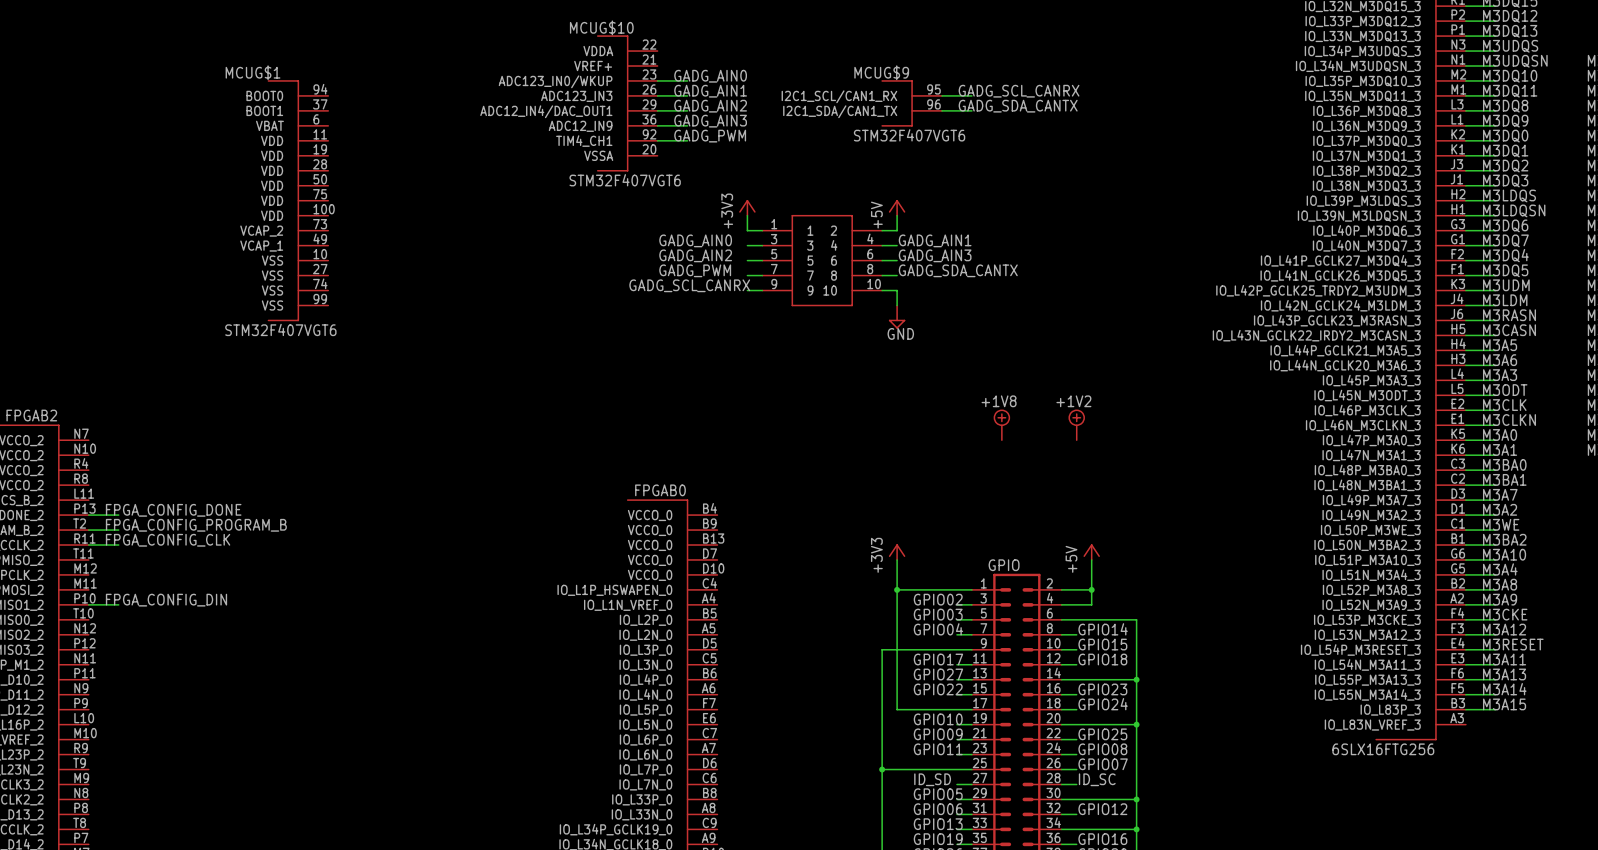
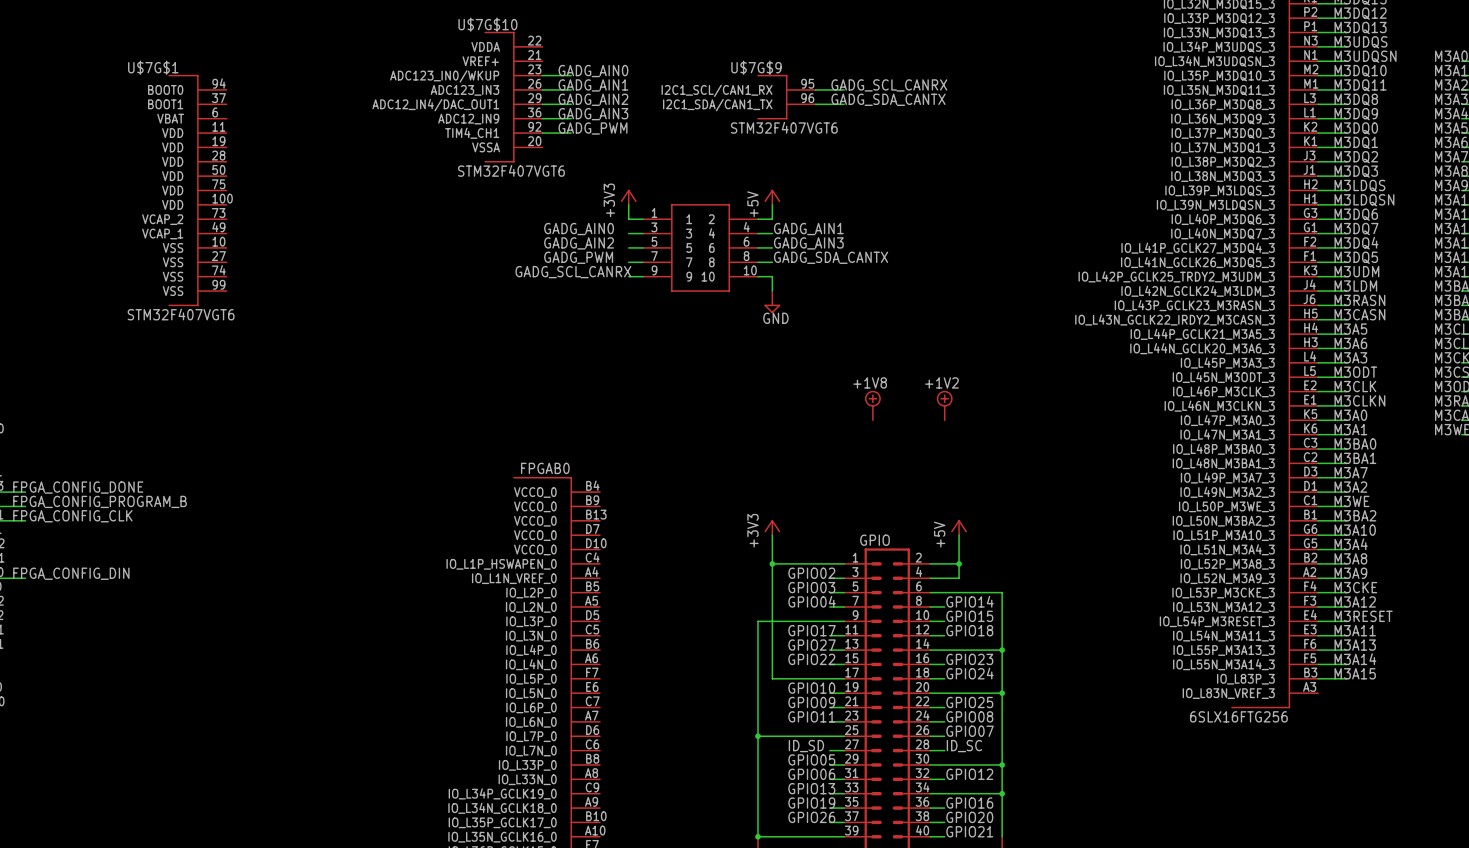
MCUG$10 name: MCUG$10 (601, 27) -> U$7G$10 (487, 24)
MCUG$1 name: MCUG$1 (253, 72) -> U$7G$1 (153, 67)
MCUG$9 name: MCUG$9 (881, 72) -> U$7G$9 (756, 67)

